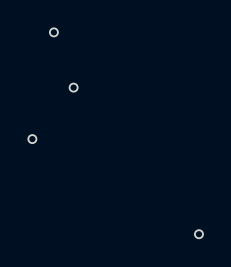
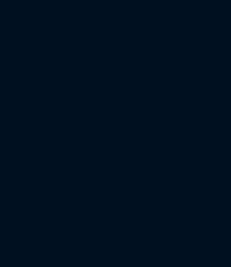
hole: (53, 32) -> none
hole: (73, 87) -> none
hole: (32, 139) -> none
hole: (198, 234) -> none

